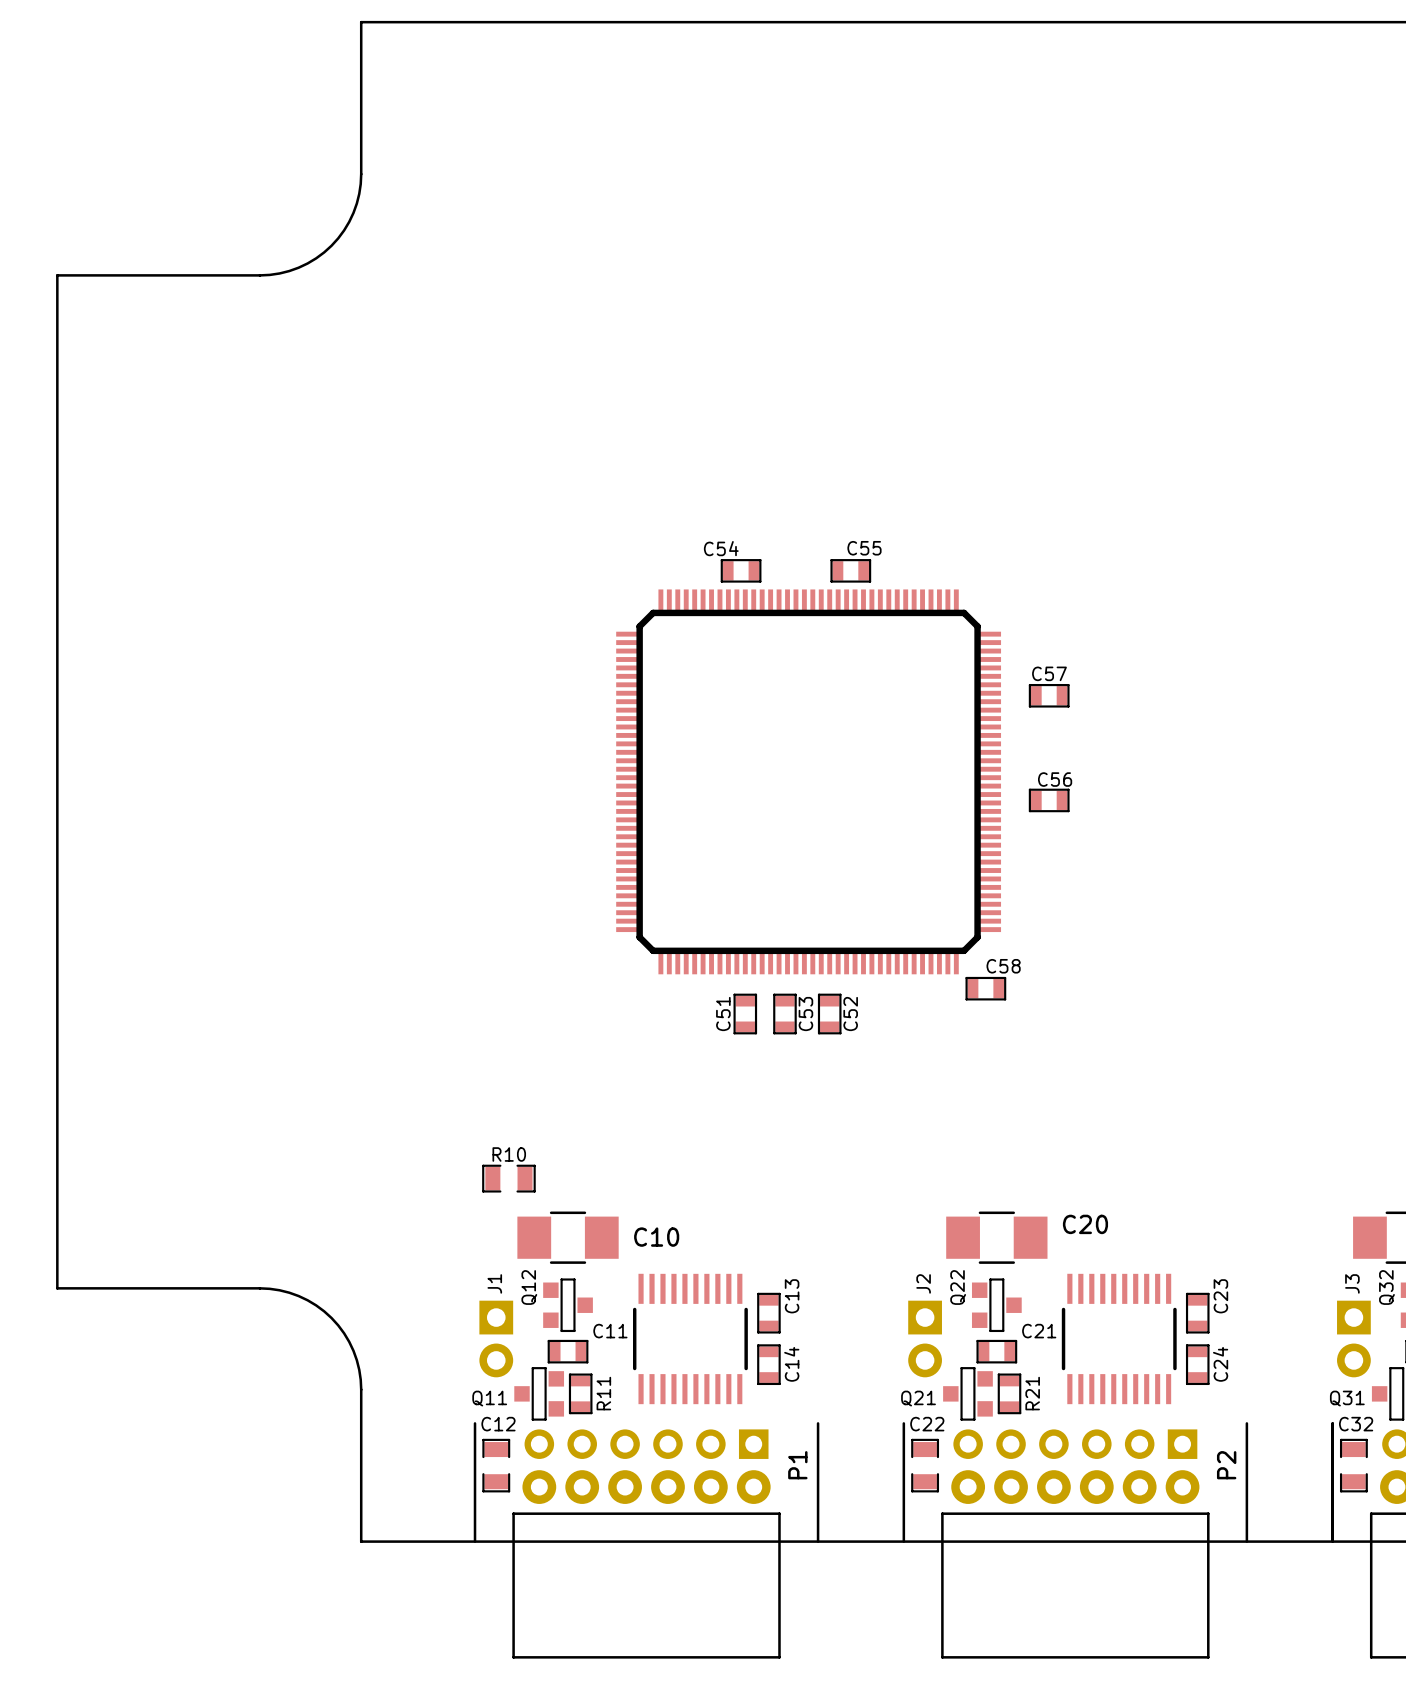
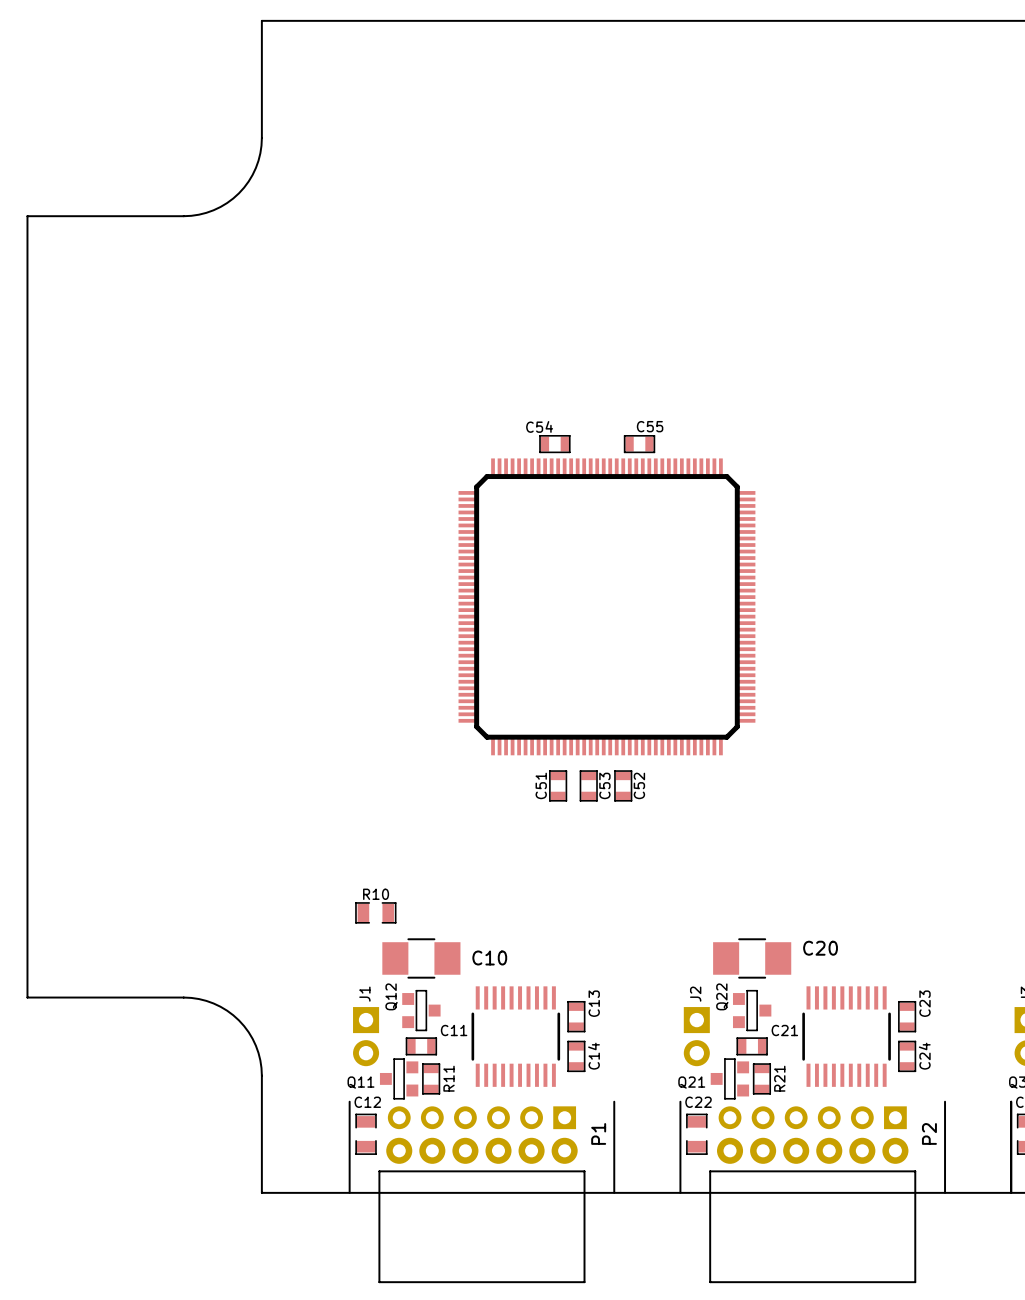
C57: (1049, 695) -> none
C56: (1049, 800) -> none
C58: (985, 988) -> none

